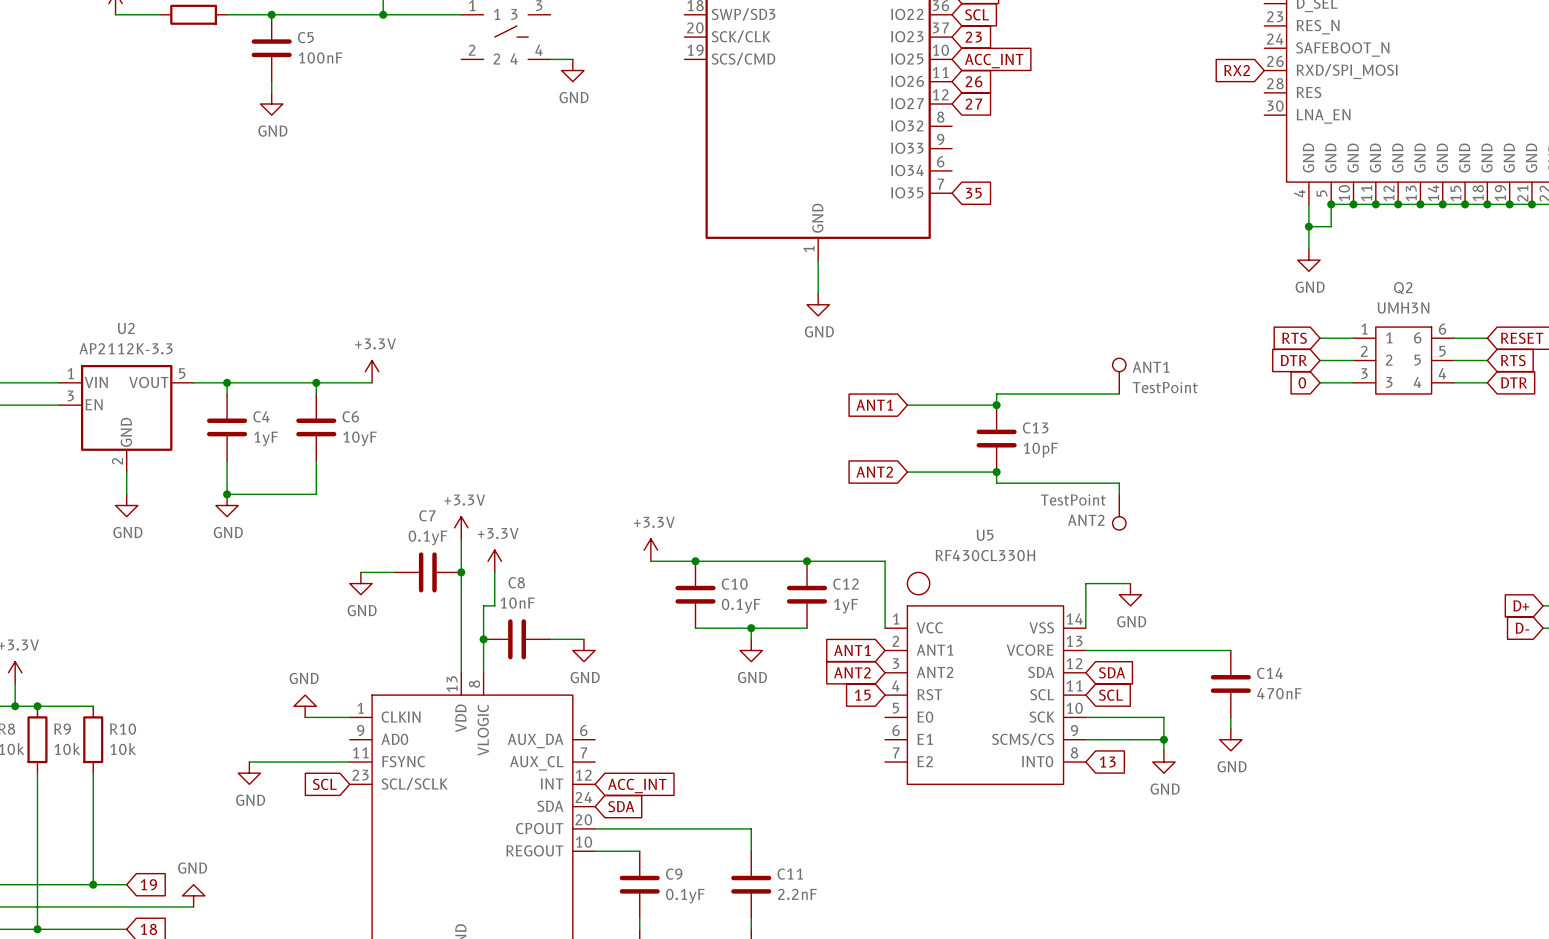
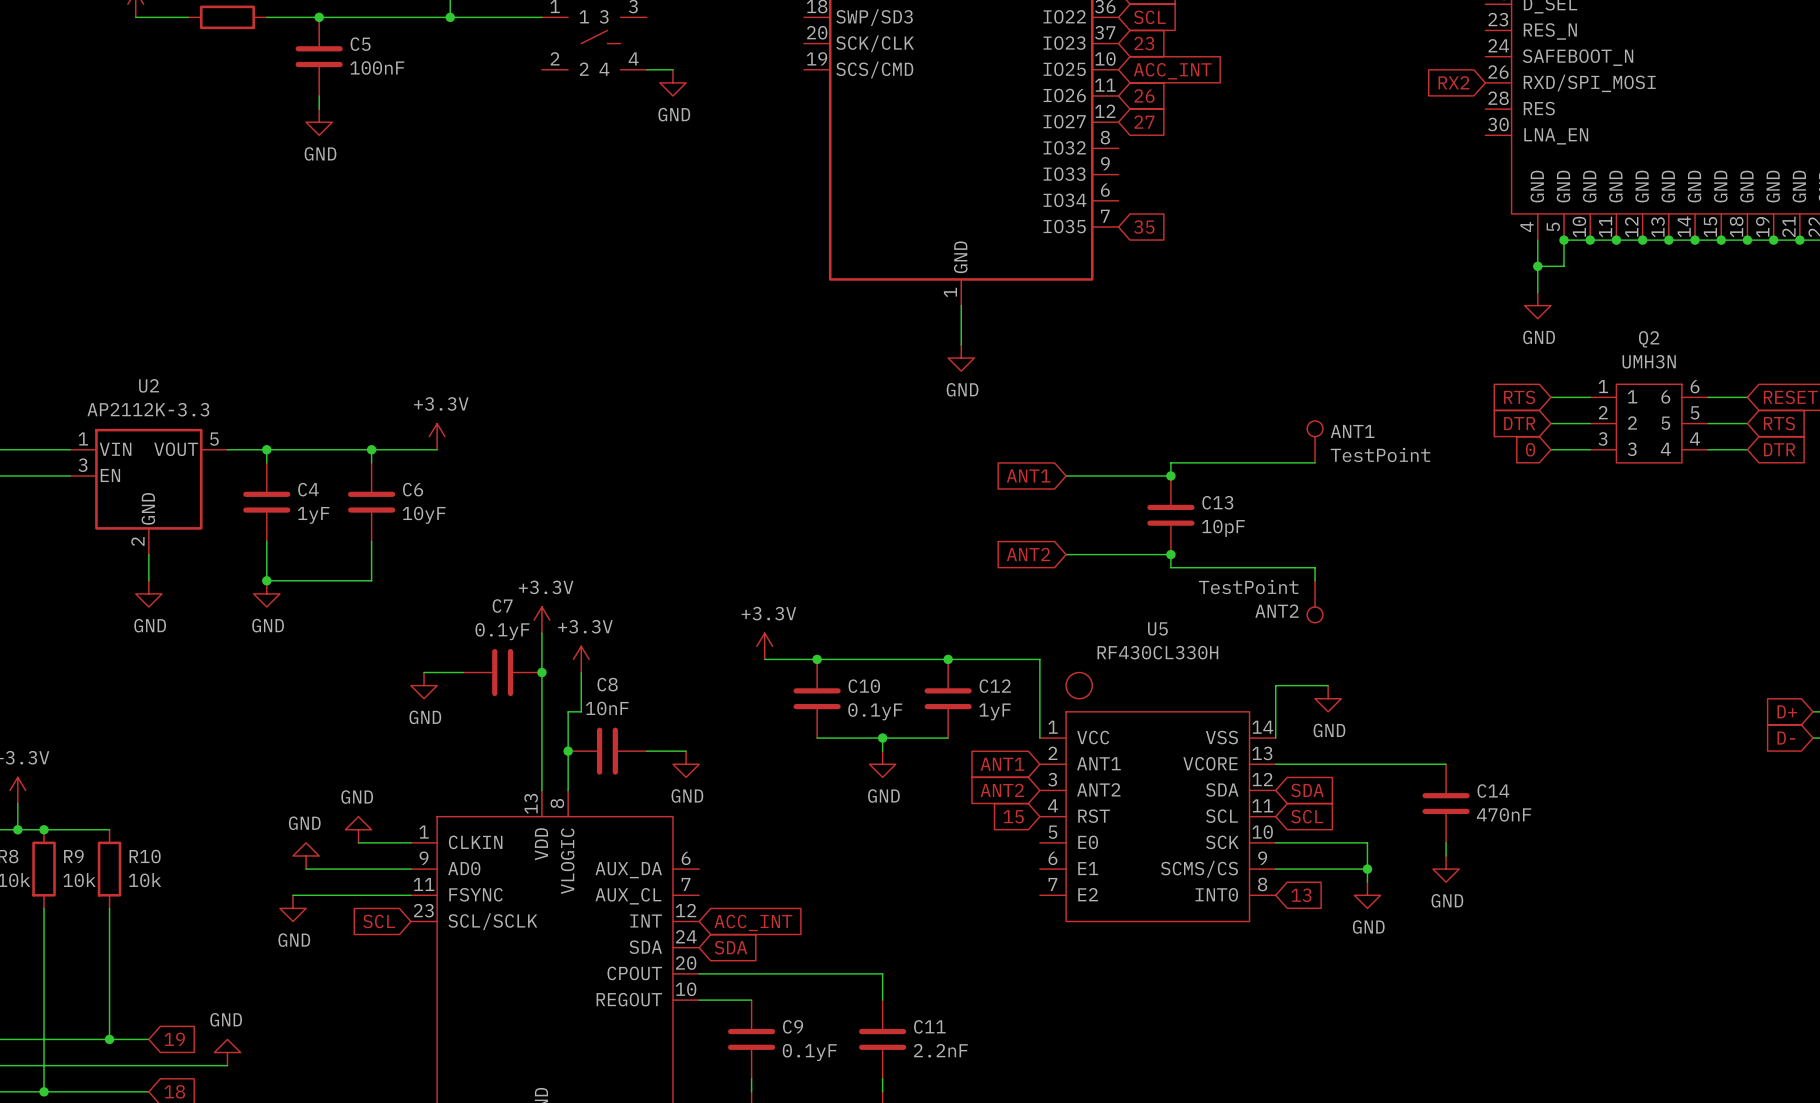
power symbol: none -> GND (306, 855)
wire: none -> (306, 869) (410, 869)

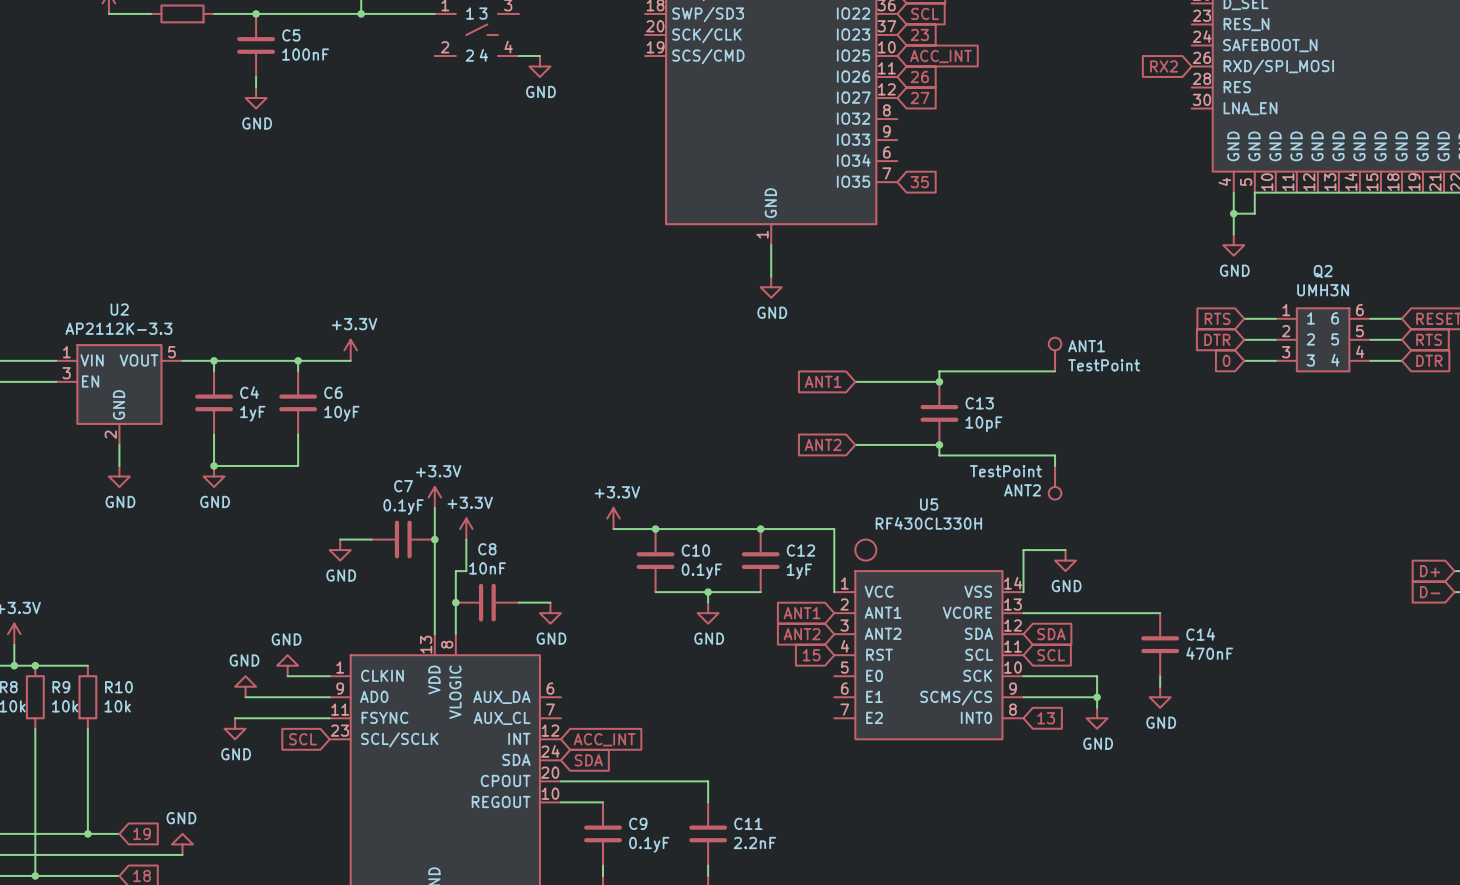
junction: (1564, 240) -> none
junction: (1590, 240) -> none
junction: (1616, 240) -> none
junction: (1642, 240) -> none
junction: (1668, 240) -> none
junction: (1695, 240) -> none
junction: (1721, 240) -> none
junction: (1747, 240) -> none
junction: (1773, 240) -> none
junction: (1799, 240) -> none

